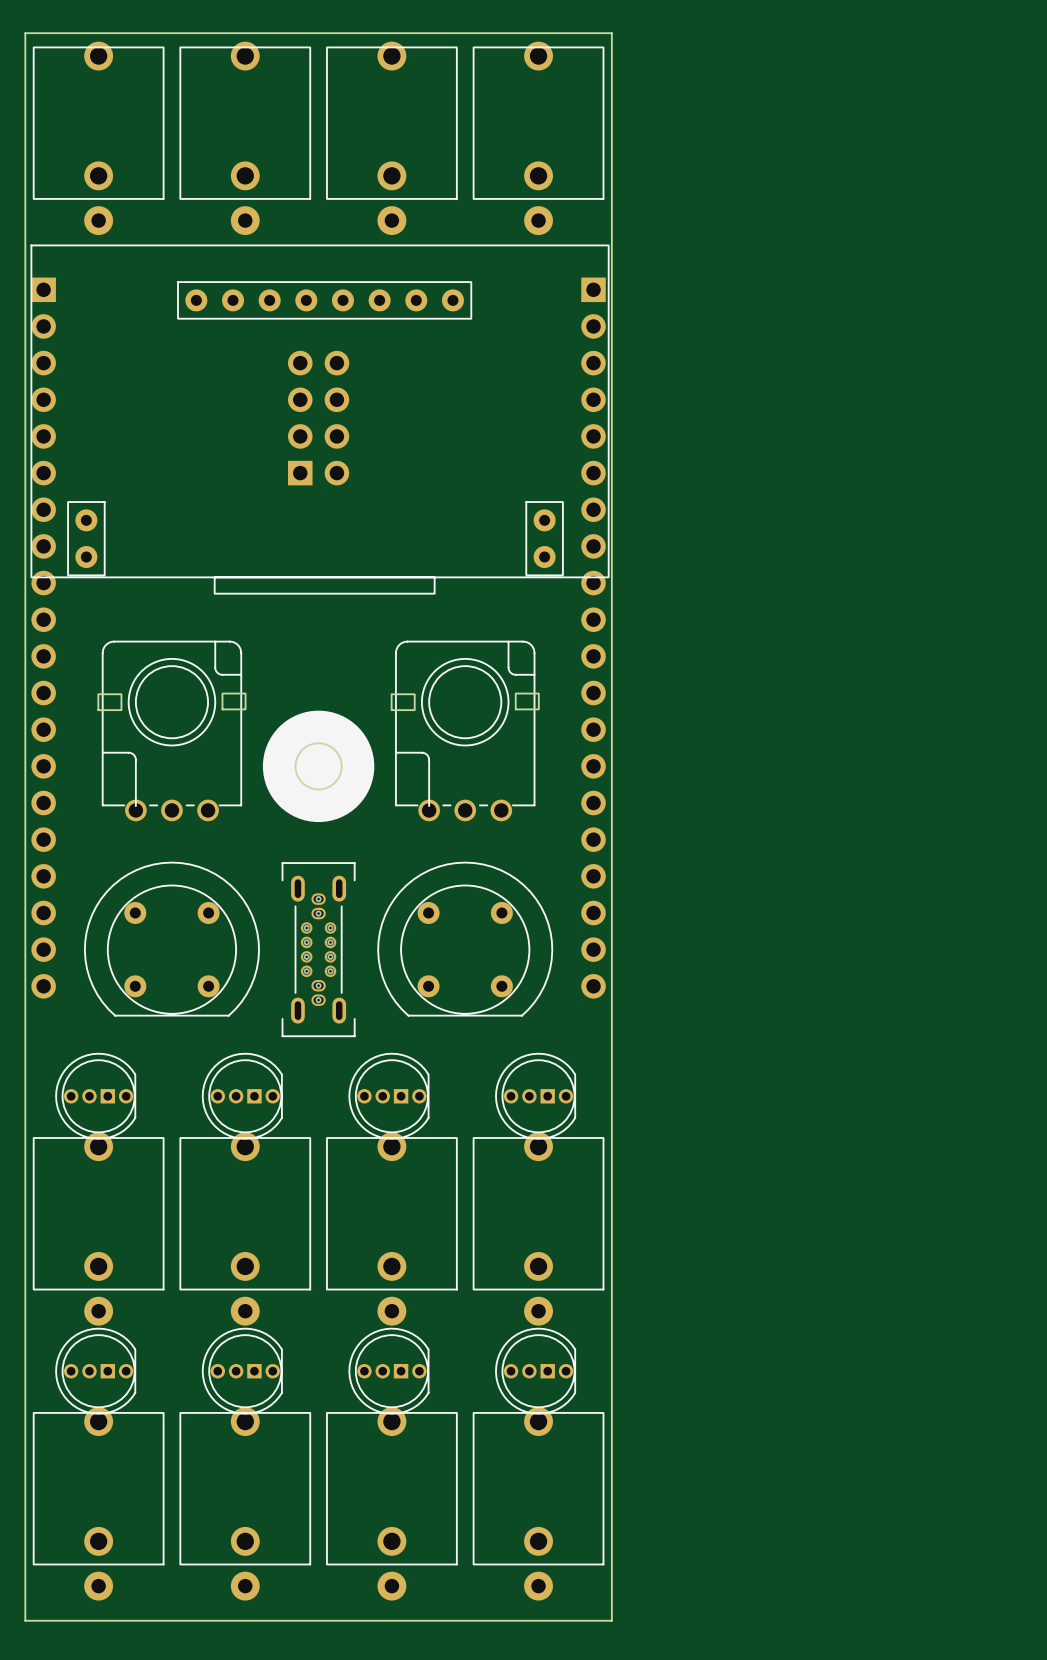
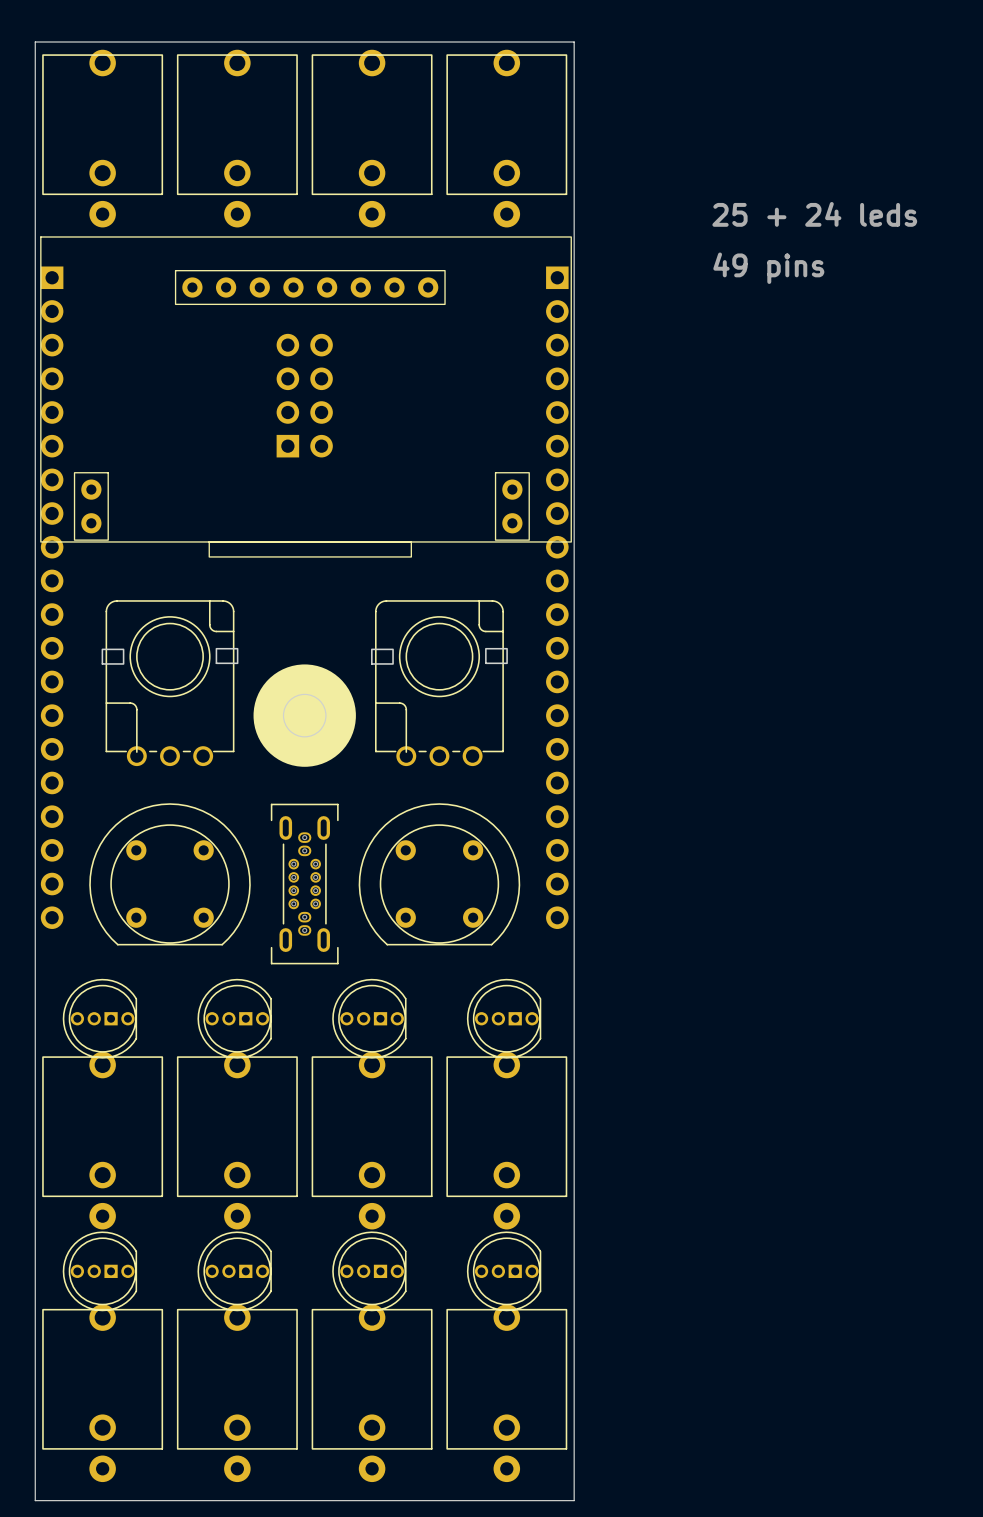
text: none -> 25 + 24 leds (814, 214)
text: none -> 49 pins (768, 268)

